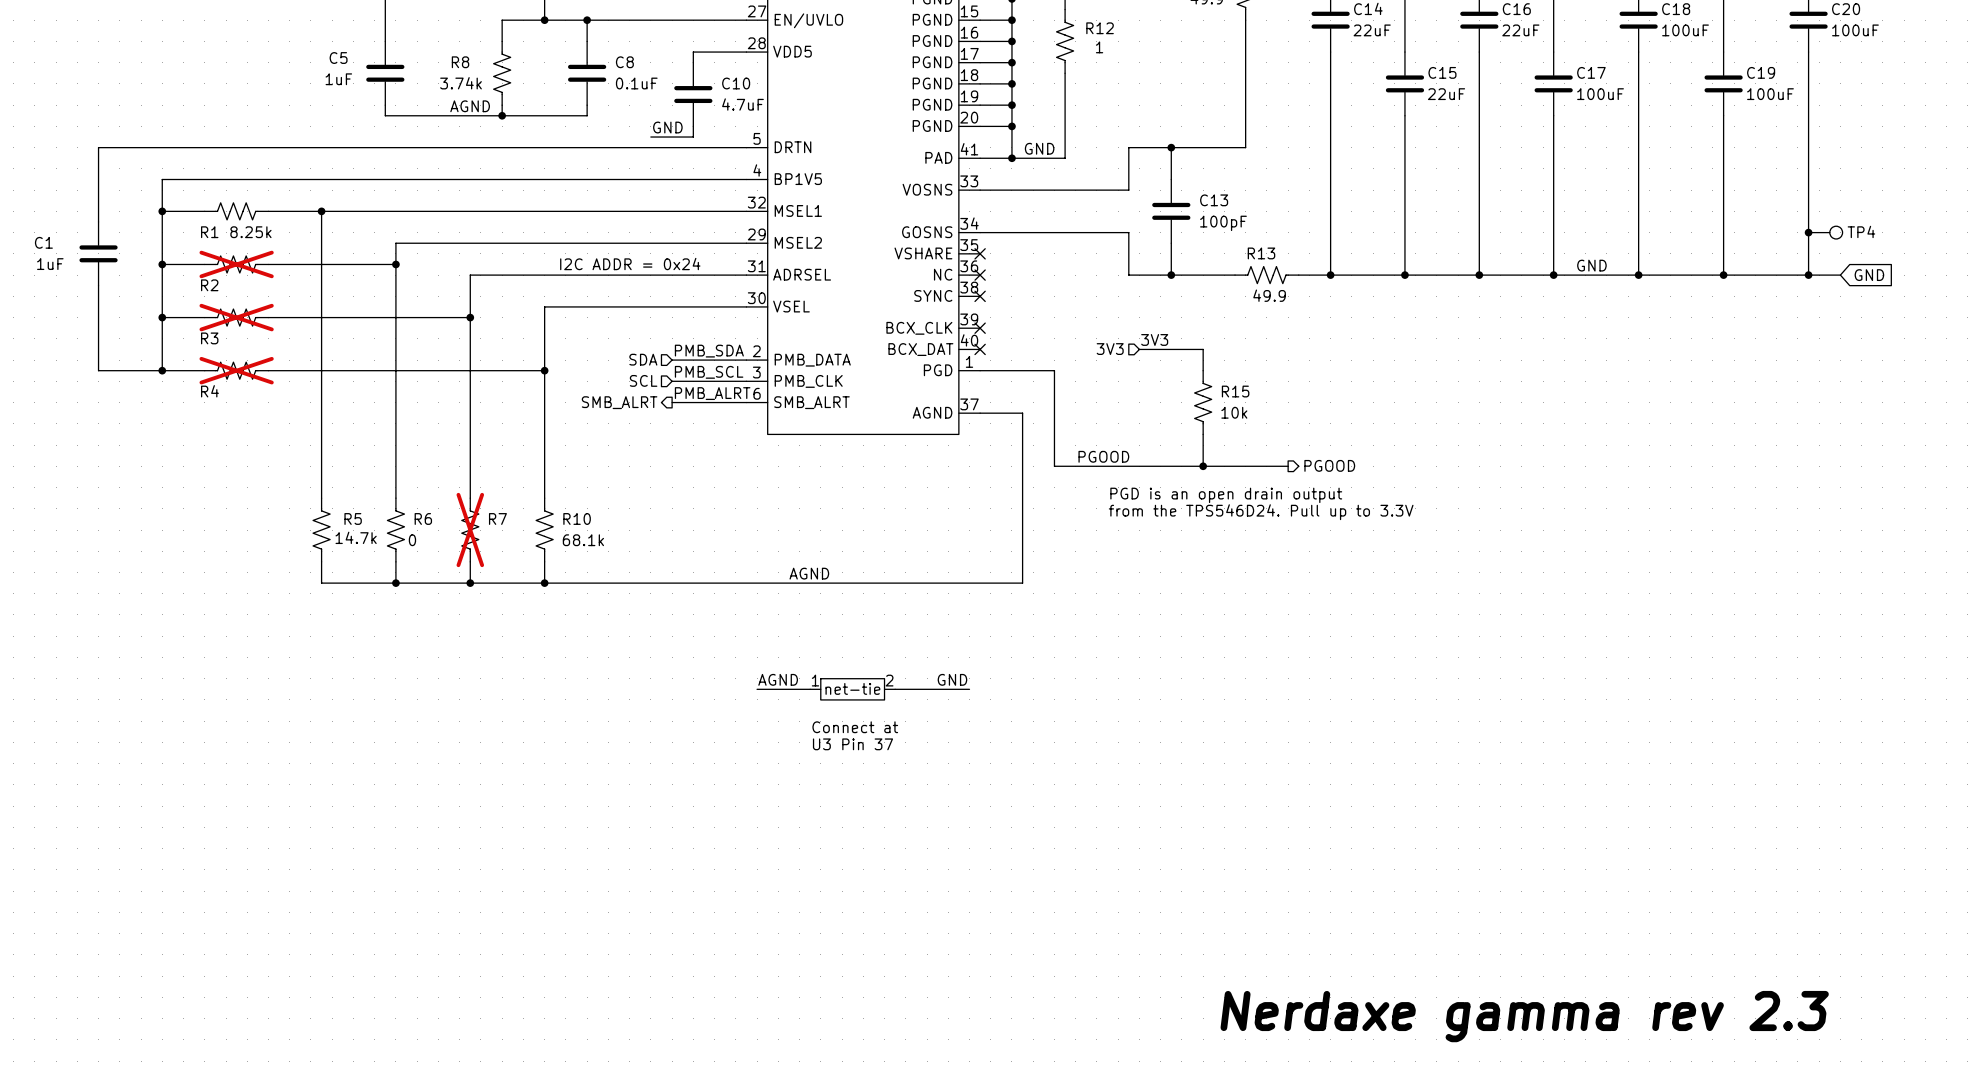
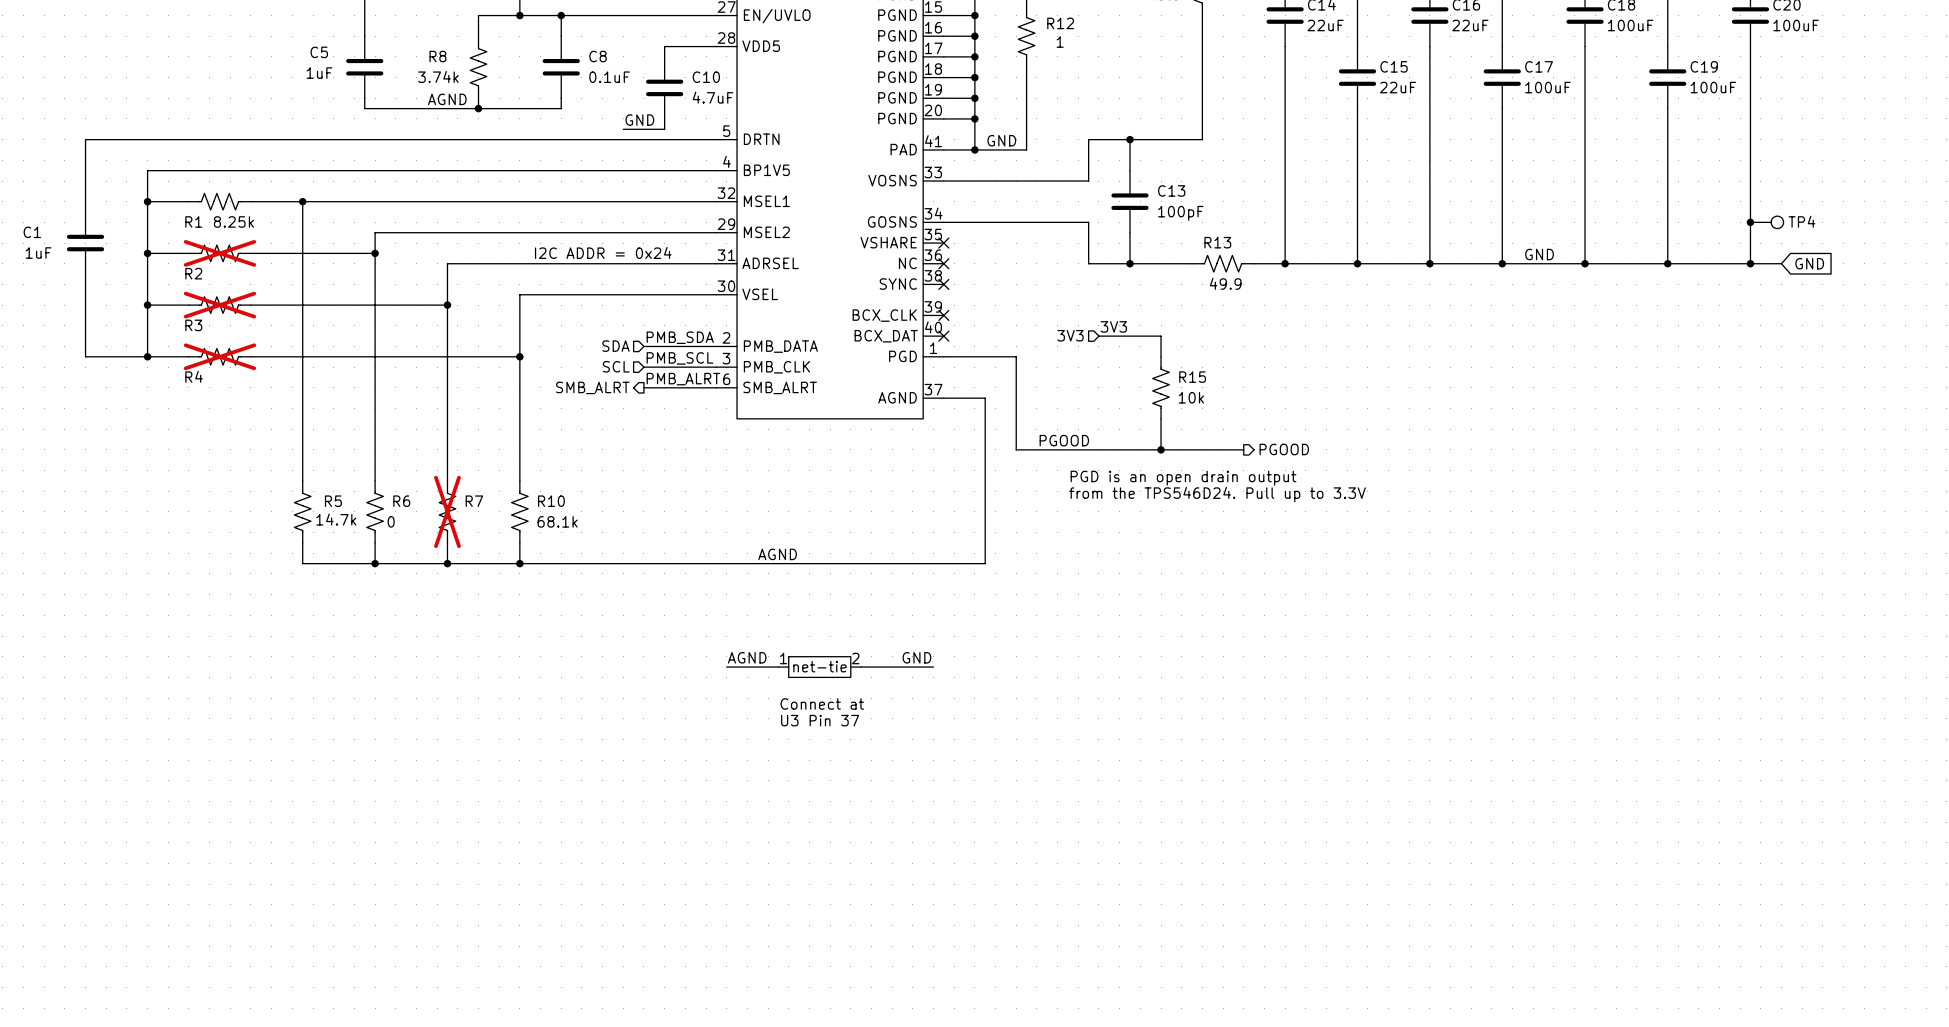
text: Nerdaxe gamma rev 2.3 (1524, 1016) -> none

